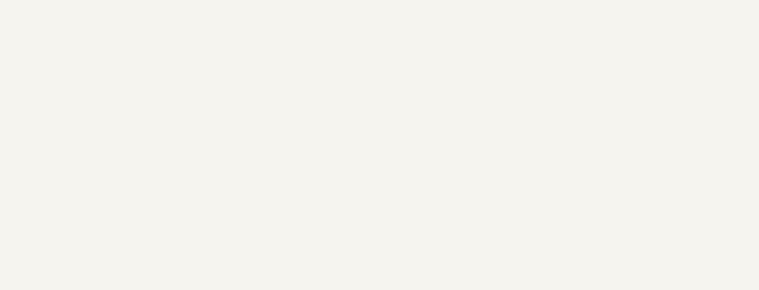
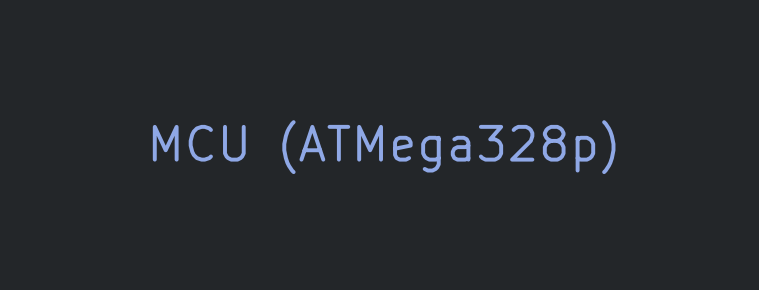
text: none -> MCU (ATMega328p) (384, 147)

